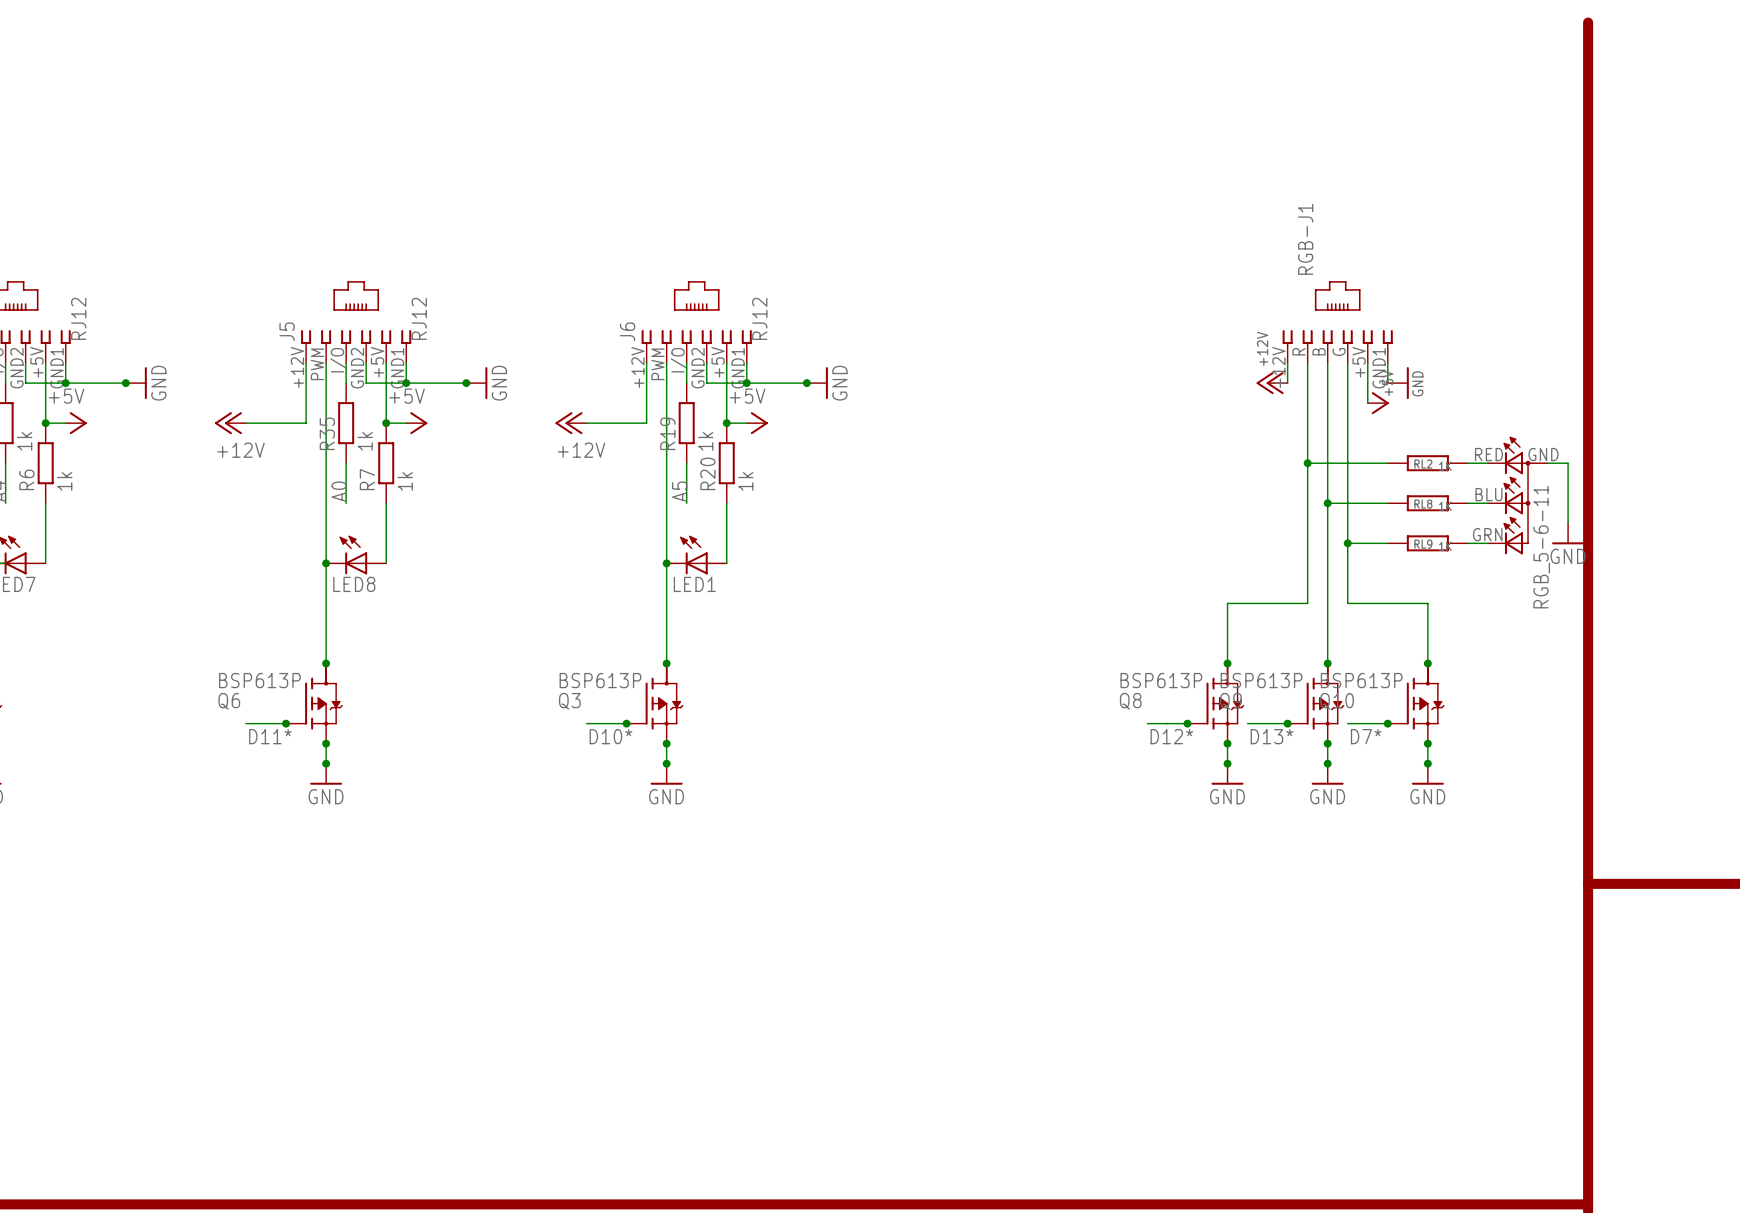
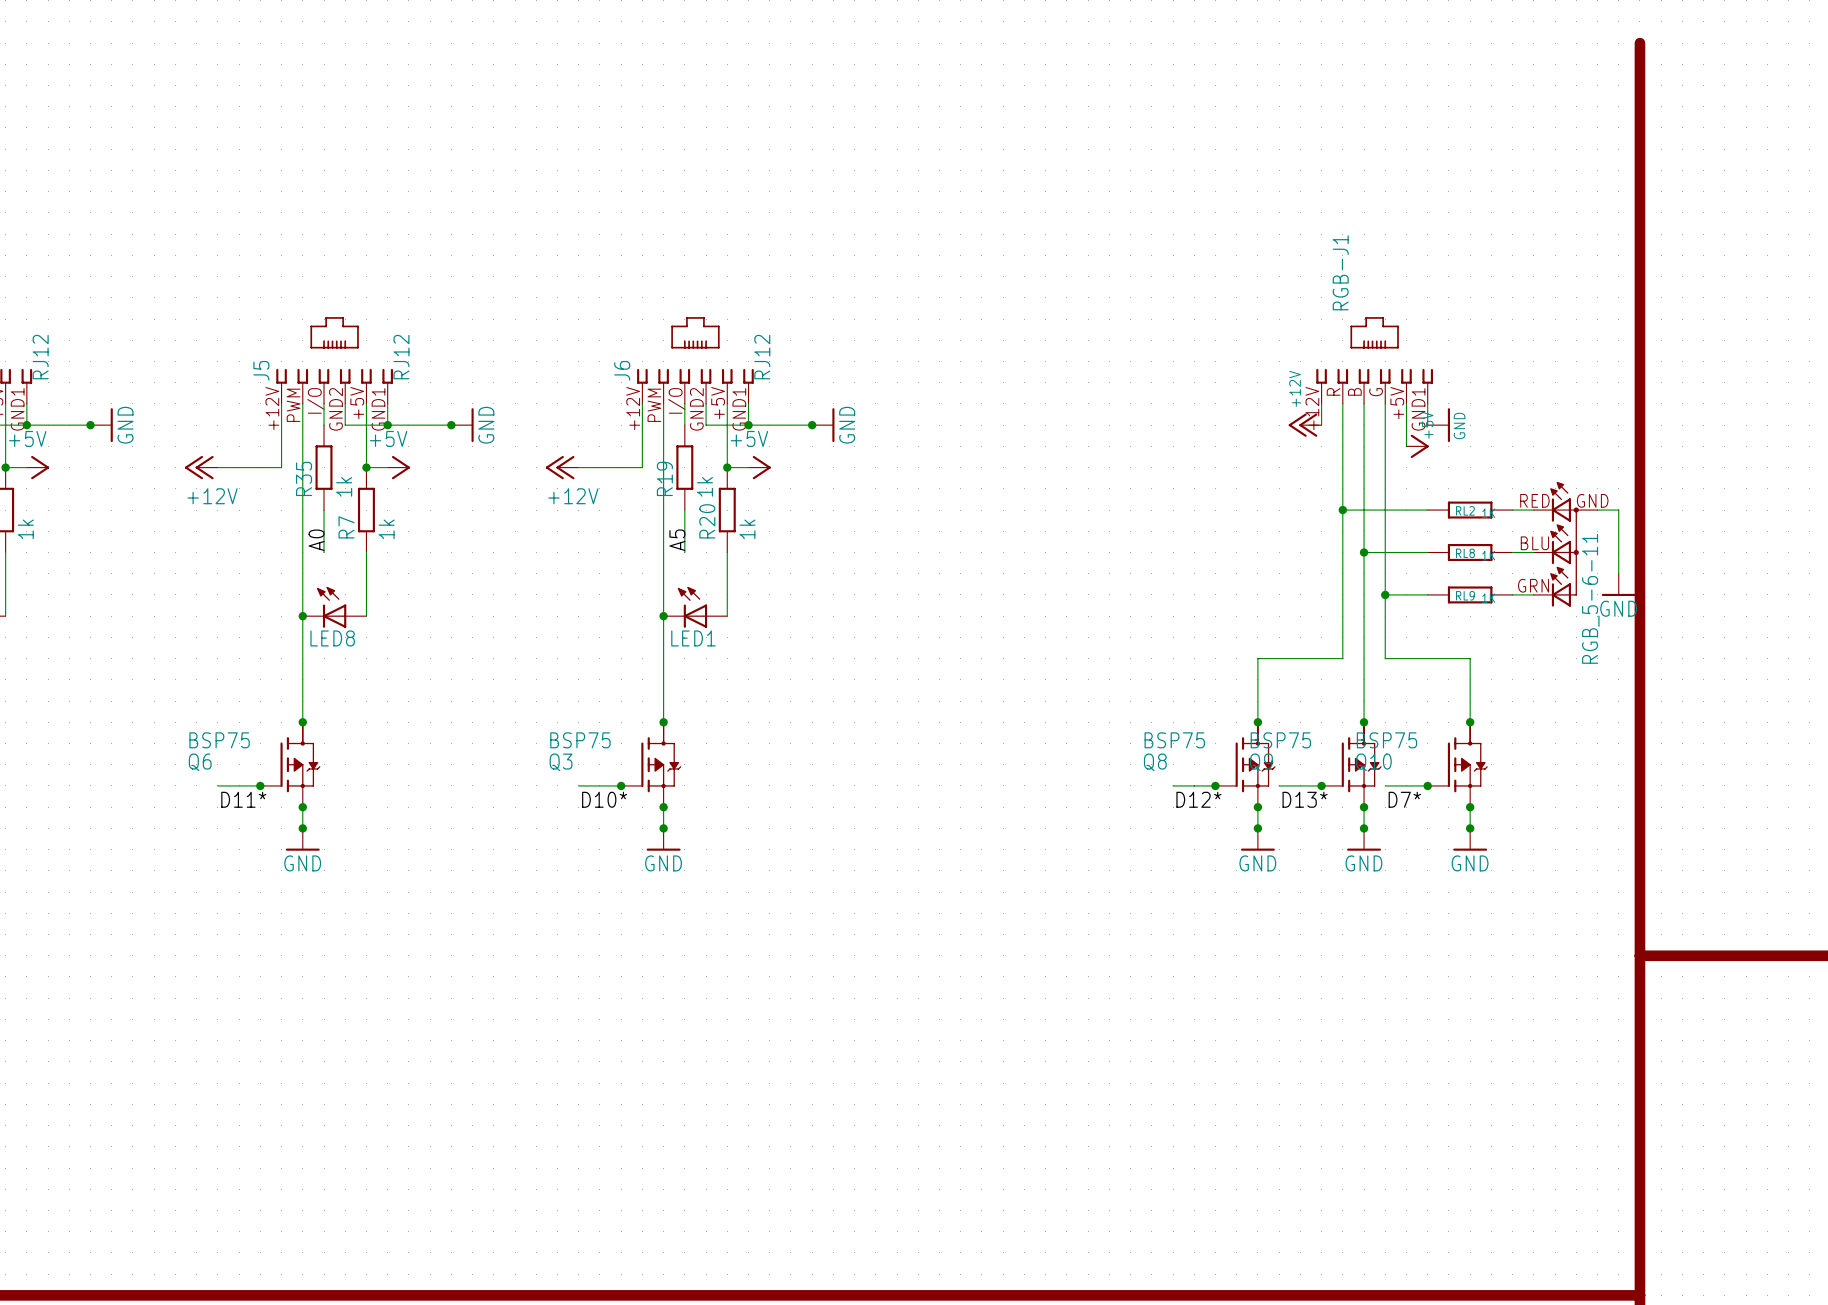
Q6 value: BSP613P (259, 680) -> BSP75 (219, 740)
Q3 value: BSP613P (600, 680) -> BSP75 (580, 740)
Q8 value: BSP613P (1161, 680) -> BSP75 (1174, 740)
Q9 value: BSP613P (1261, 680) -> BSP75 (1280, 740)
Q10 value: BSP613P (1361, 680) -> BSP75 (1386, 740)

